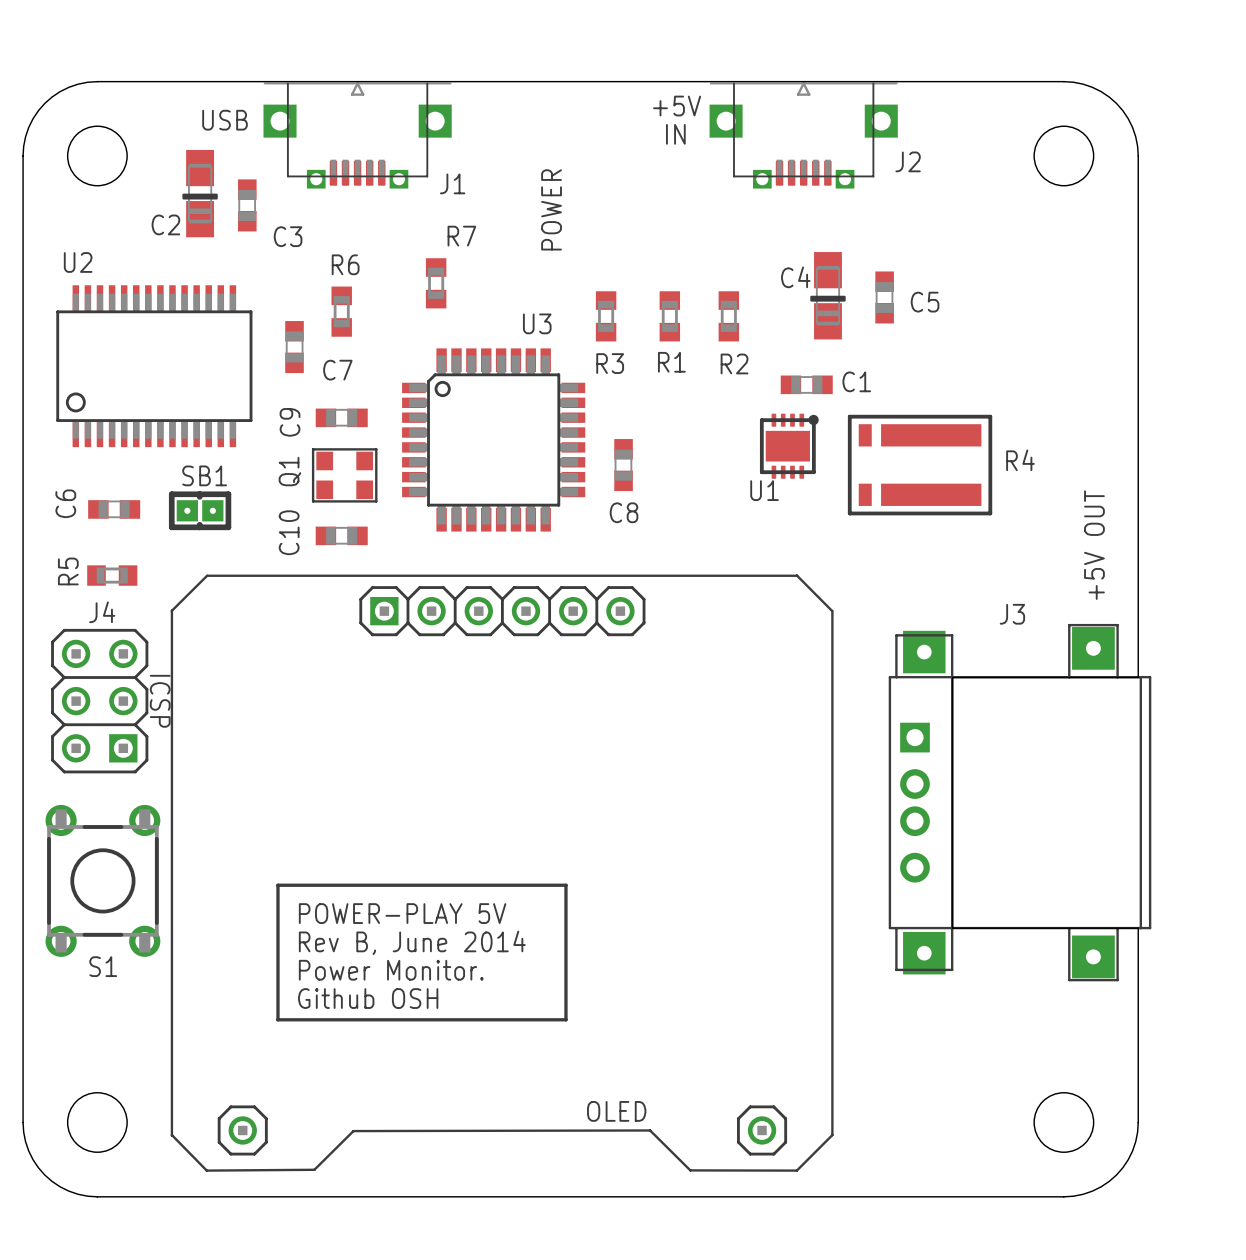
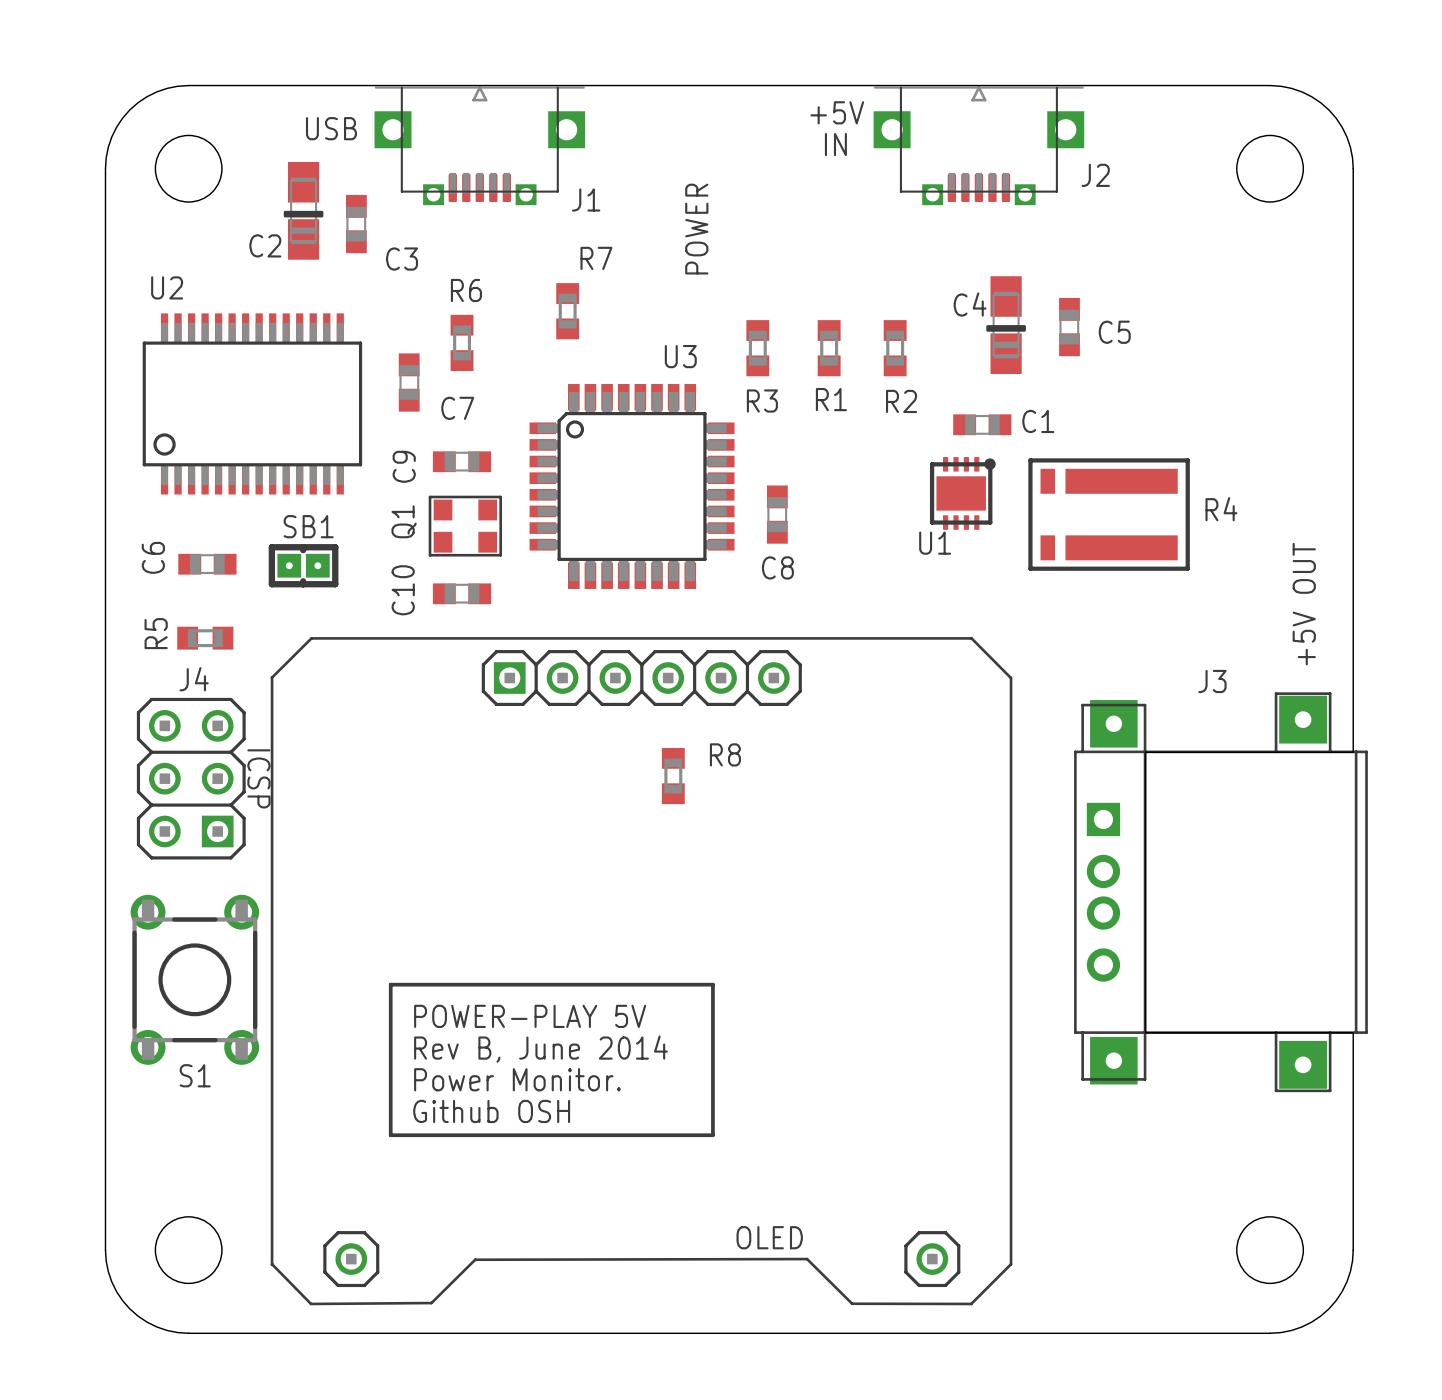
R8: none -> (673, 776)

